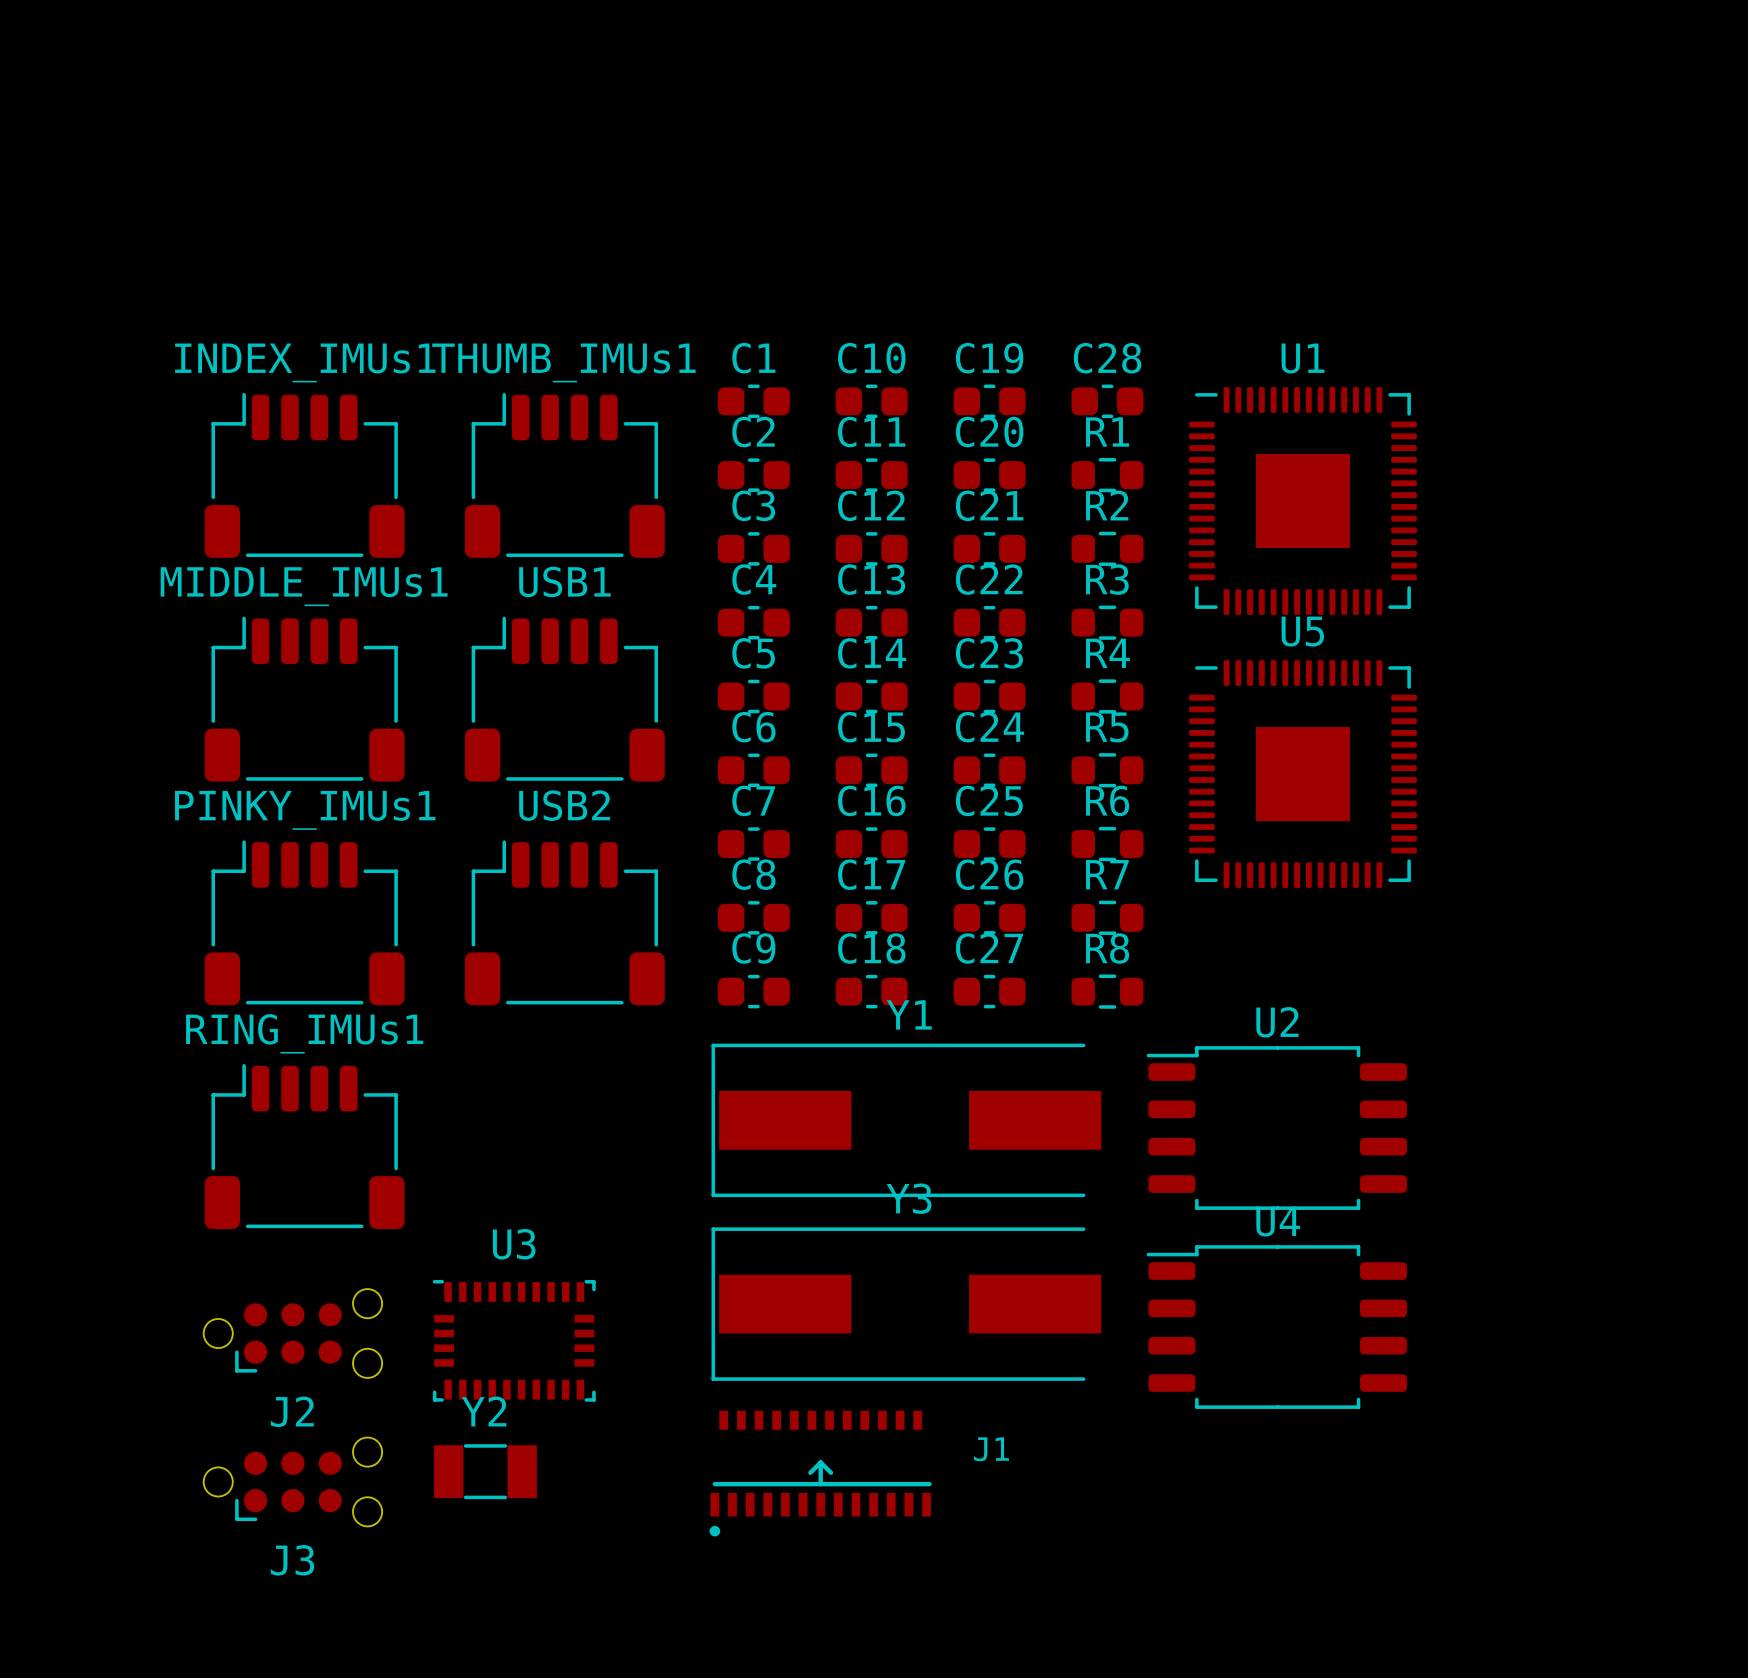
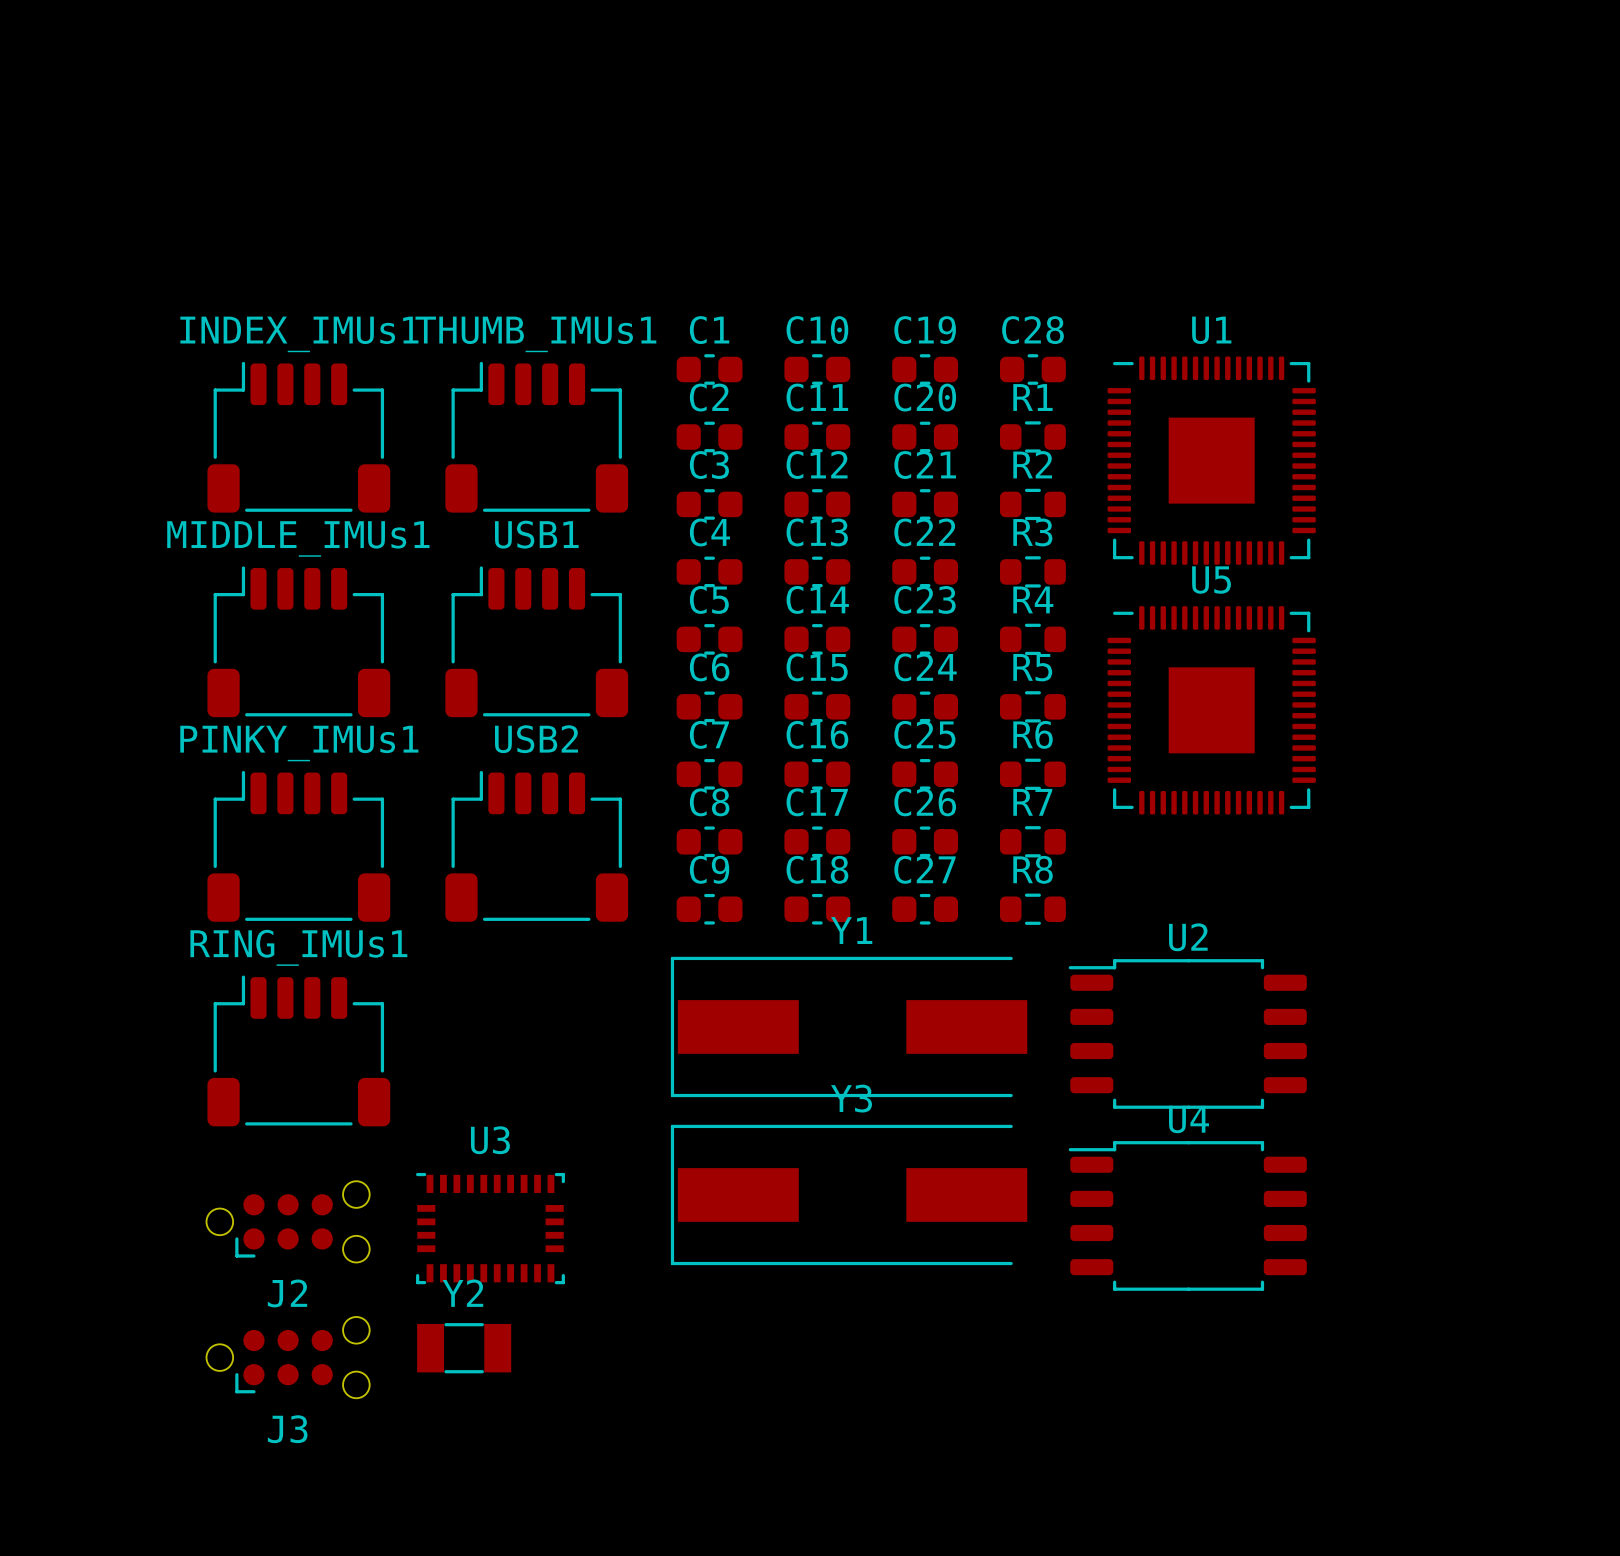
J1: (820, 1473) -> none

